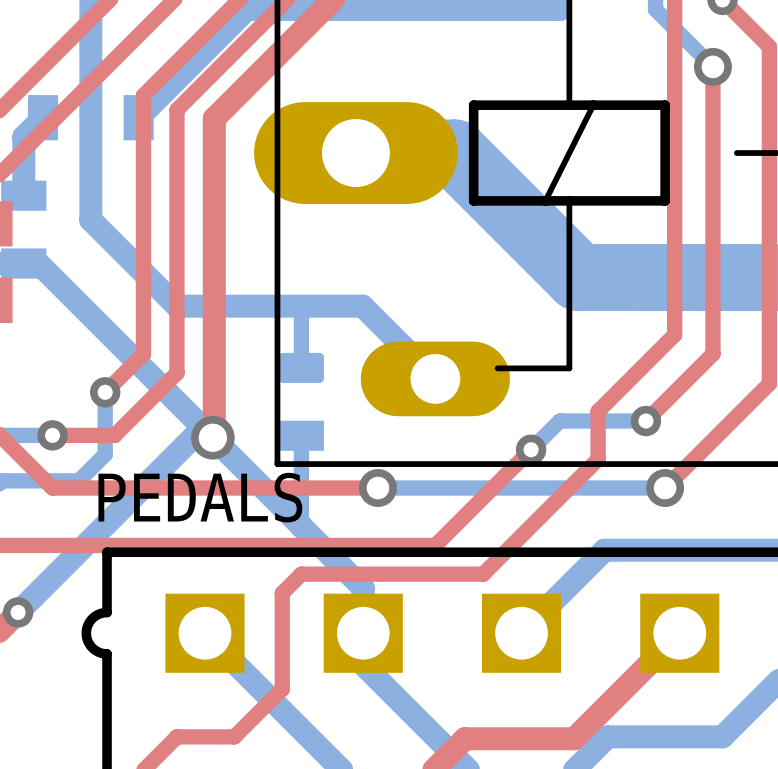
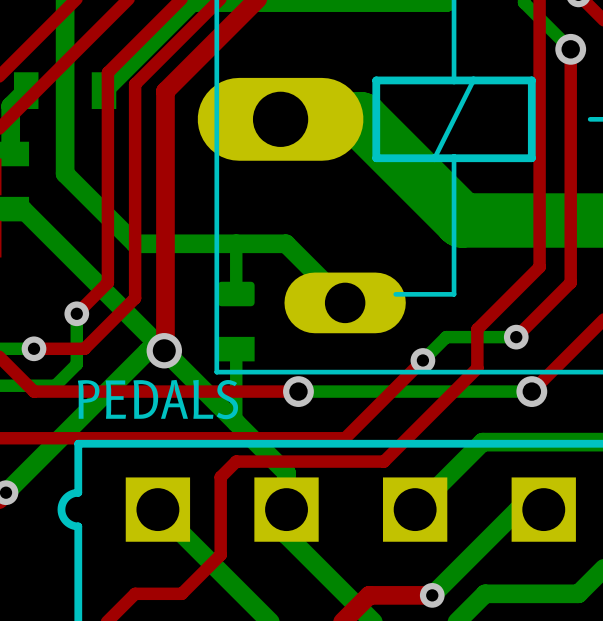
bottom track: none -> (543, 509) (518, 509) (432, 595)
top track: (679, 633) (574, 738) (542, 738) -> none
via: none -> (432, 595)

